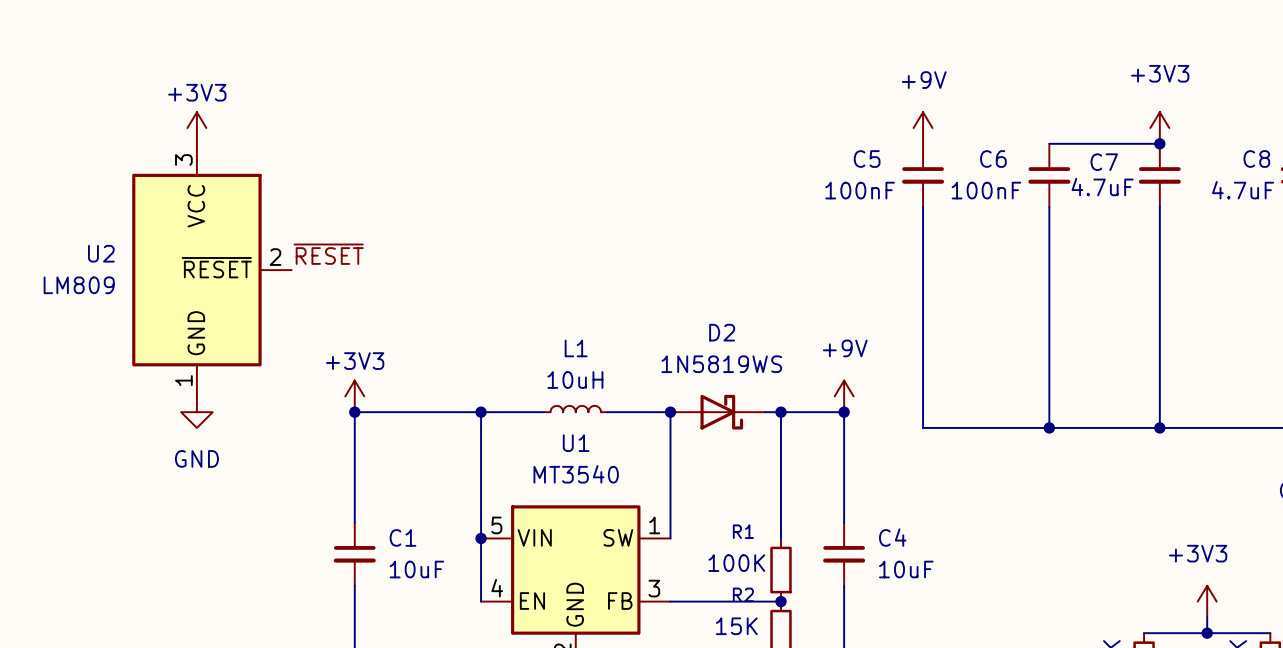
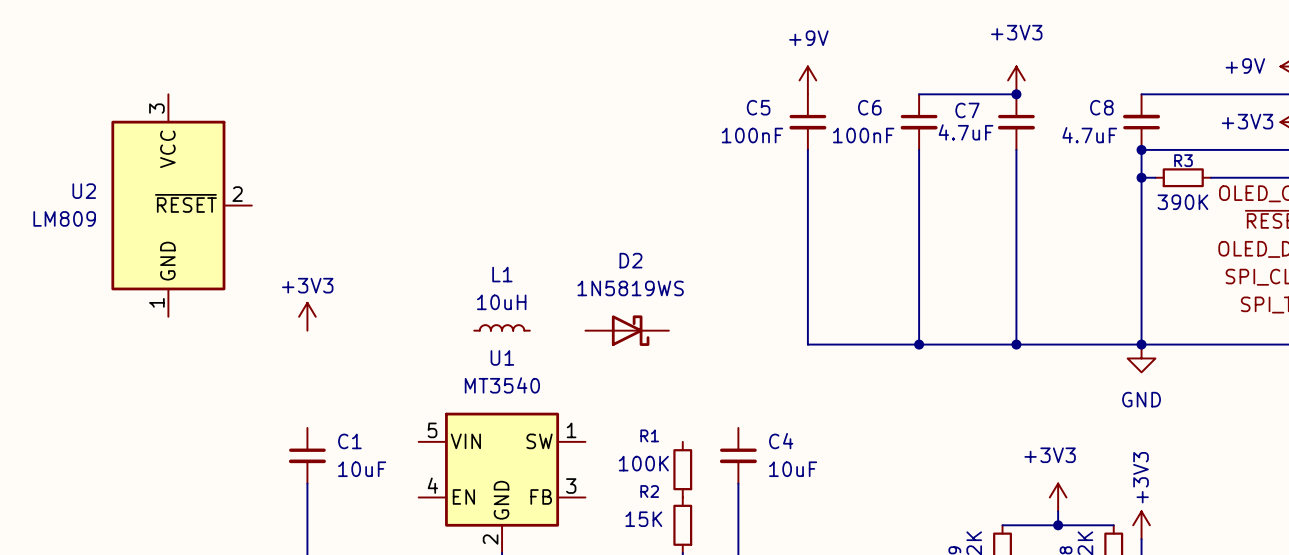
power symbol: +3V3 (196, 128) -> none
label: ~{RESET} (328, 254) -> none
power symbol: +9V (844, 396) -> none
power symbol: GND (196, 412) -> none
junction: (354, 412) -> none
wire: (481, 412) (481, 601) -> none
junction: (481, 412) -> none
wire: (544, 412) (354, 412) (354, 522) -> none
wire: (607, 412) (670, 412) (670, 538) -> none
junction: (670, 412) -> none
wire: (765, 412) (844, 412) (844, 522) -> none
wire: (780, 412) (780, 538) -> none
junction: (780, 412) -> none
junction: (844, 412) -> none
junction: (481, 538) -> none
wire: (670, 601) (780, 601) -> none
junction: (780, 601) -> none

